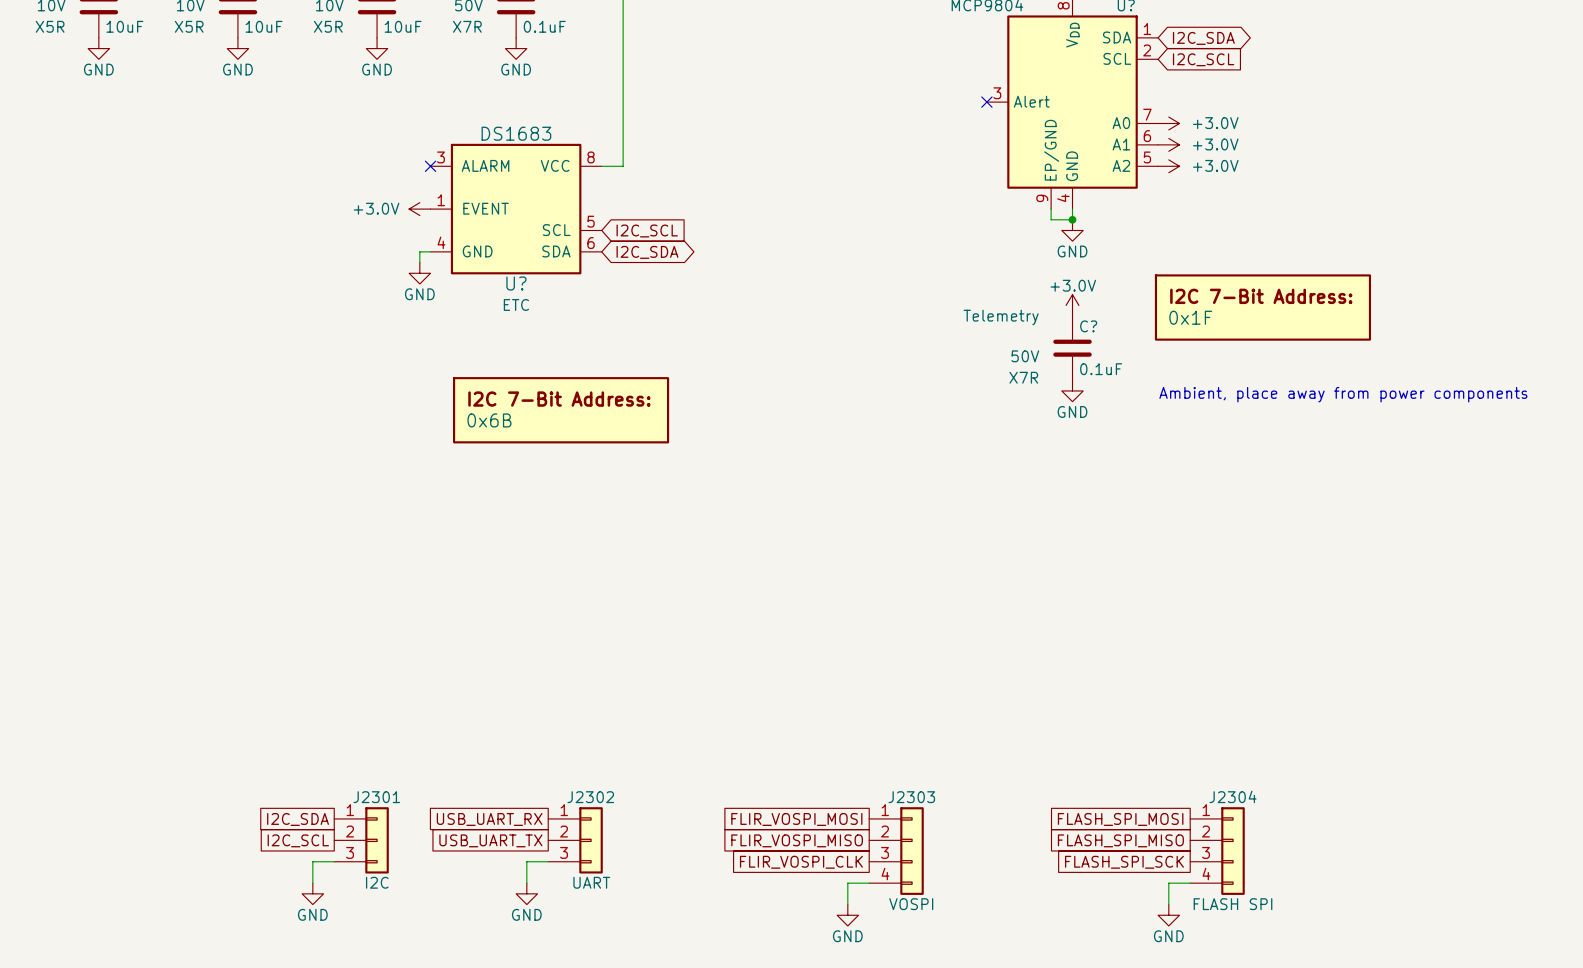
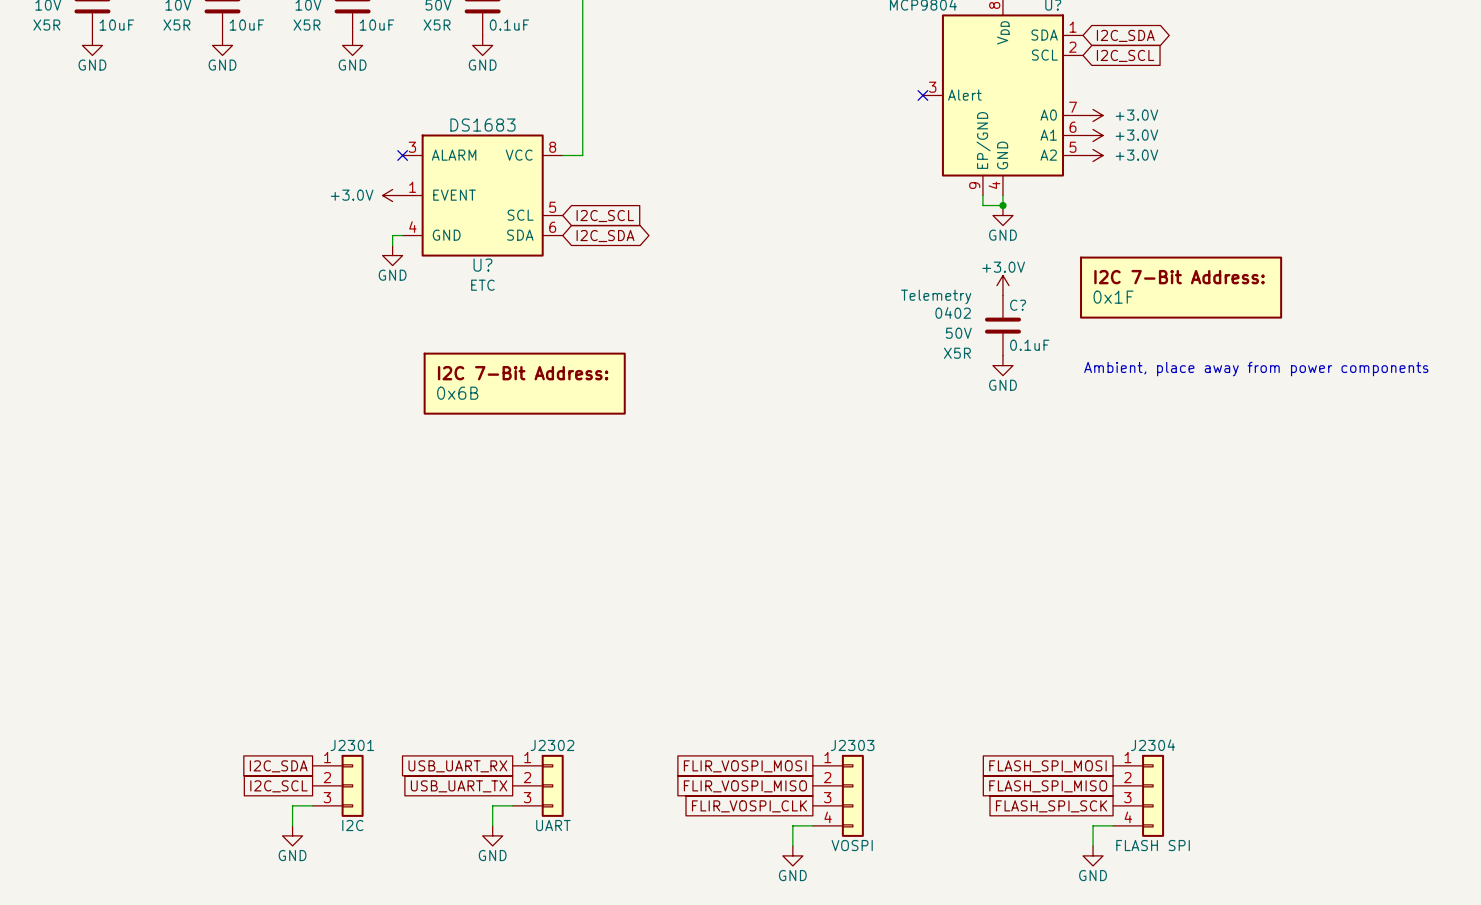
part text: X7R (467, 26) -> X5R (437, 25)
C? text: none -> 0402 (953, 312)
C? text: X7R (1023, 377) -> X5R (957, 353)

